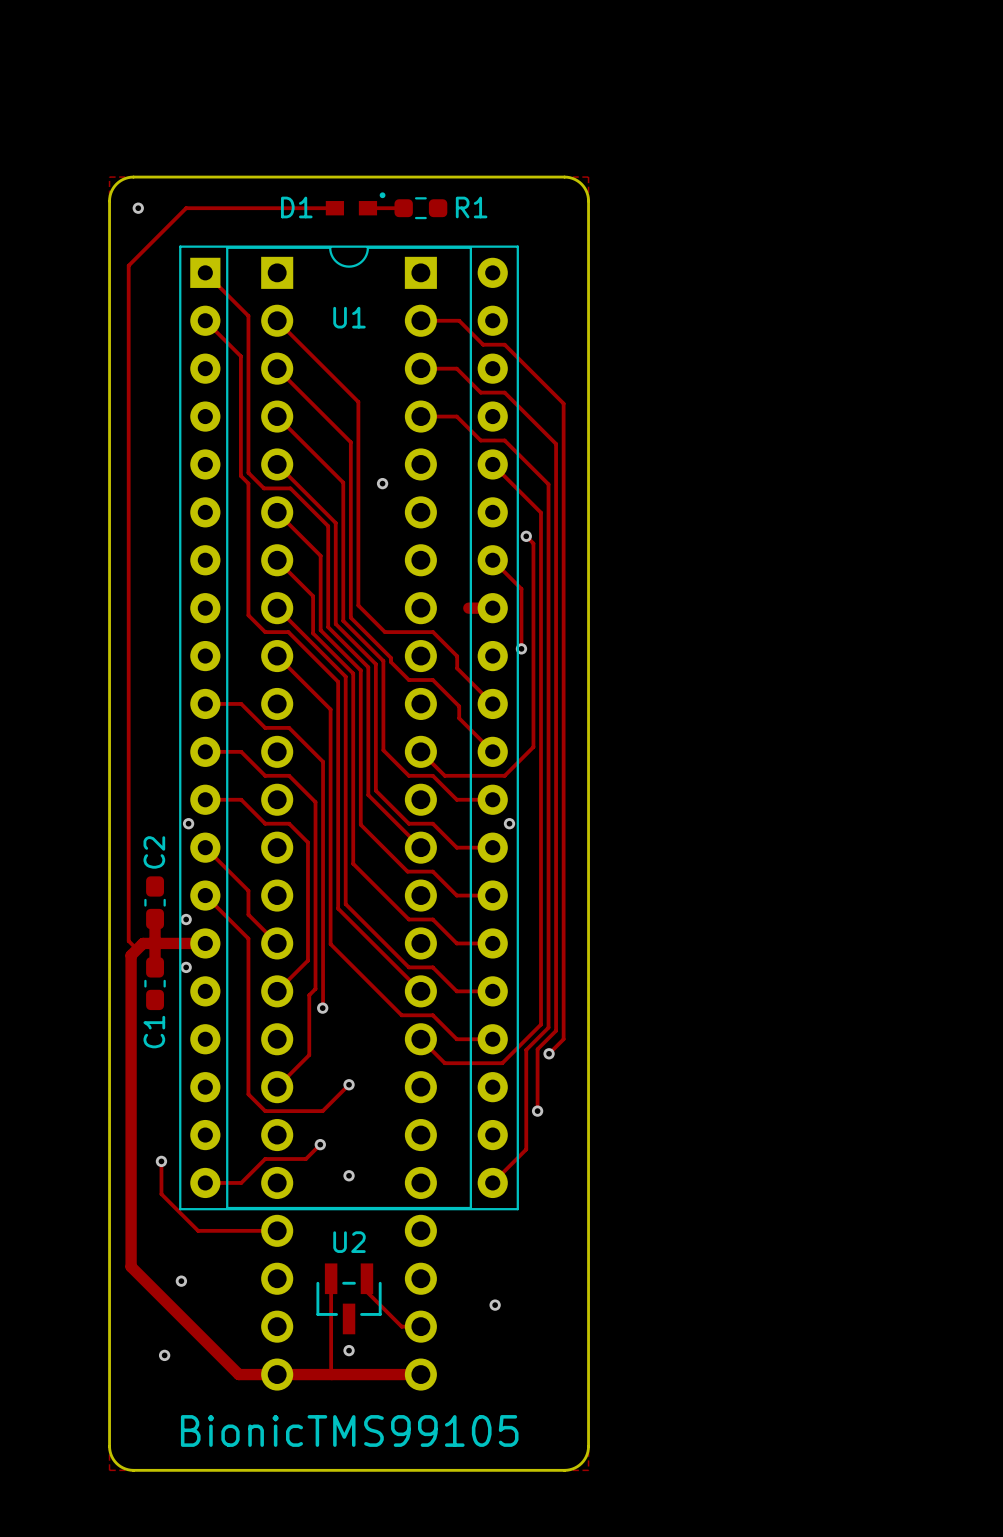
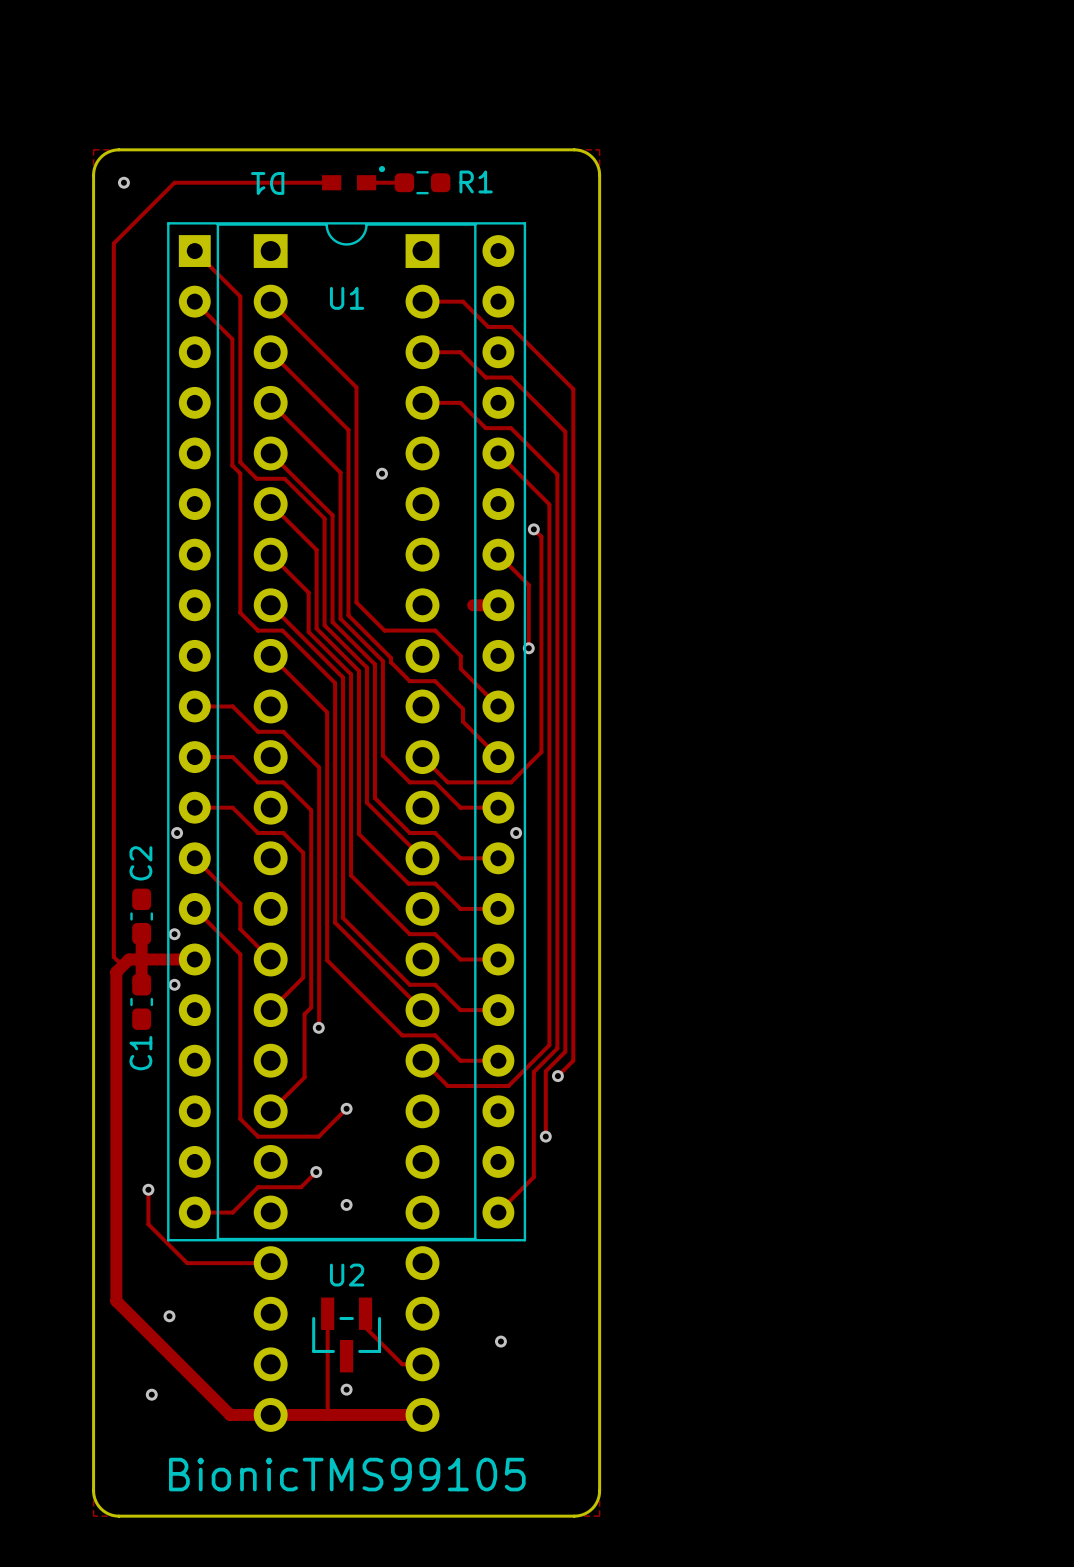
D1 name rotation: 0° (296, 207) -> 180° (267, 183)

